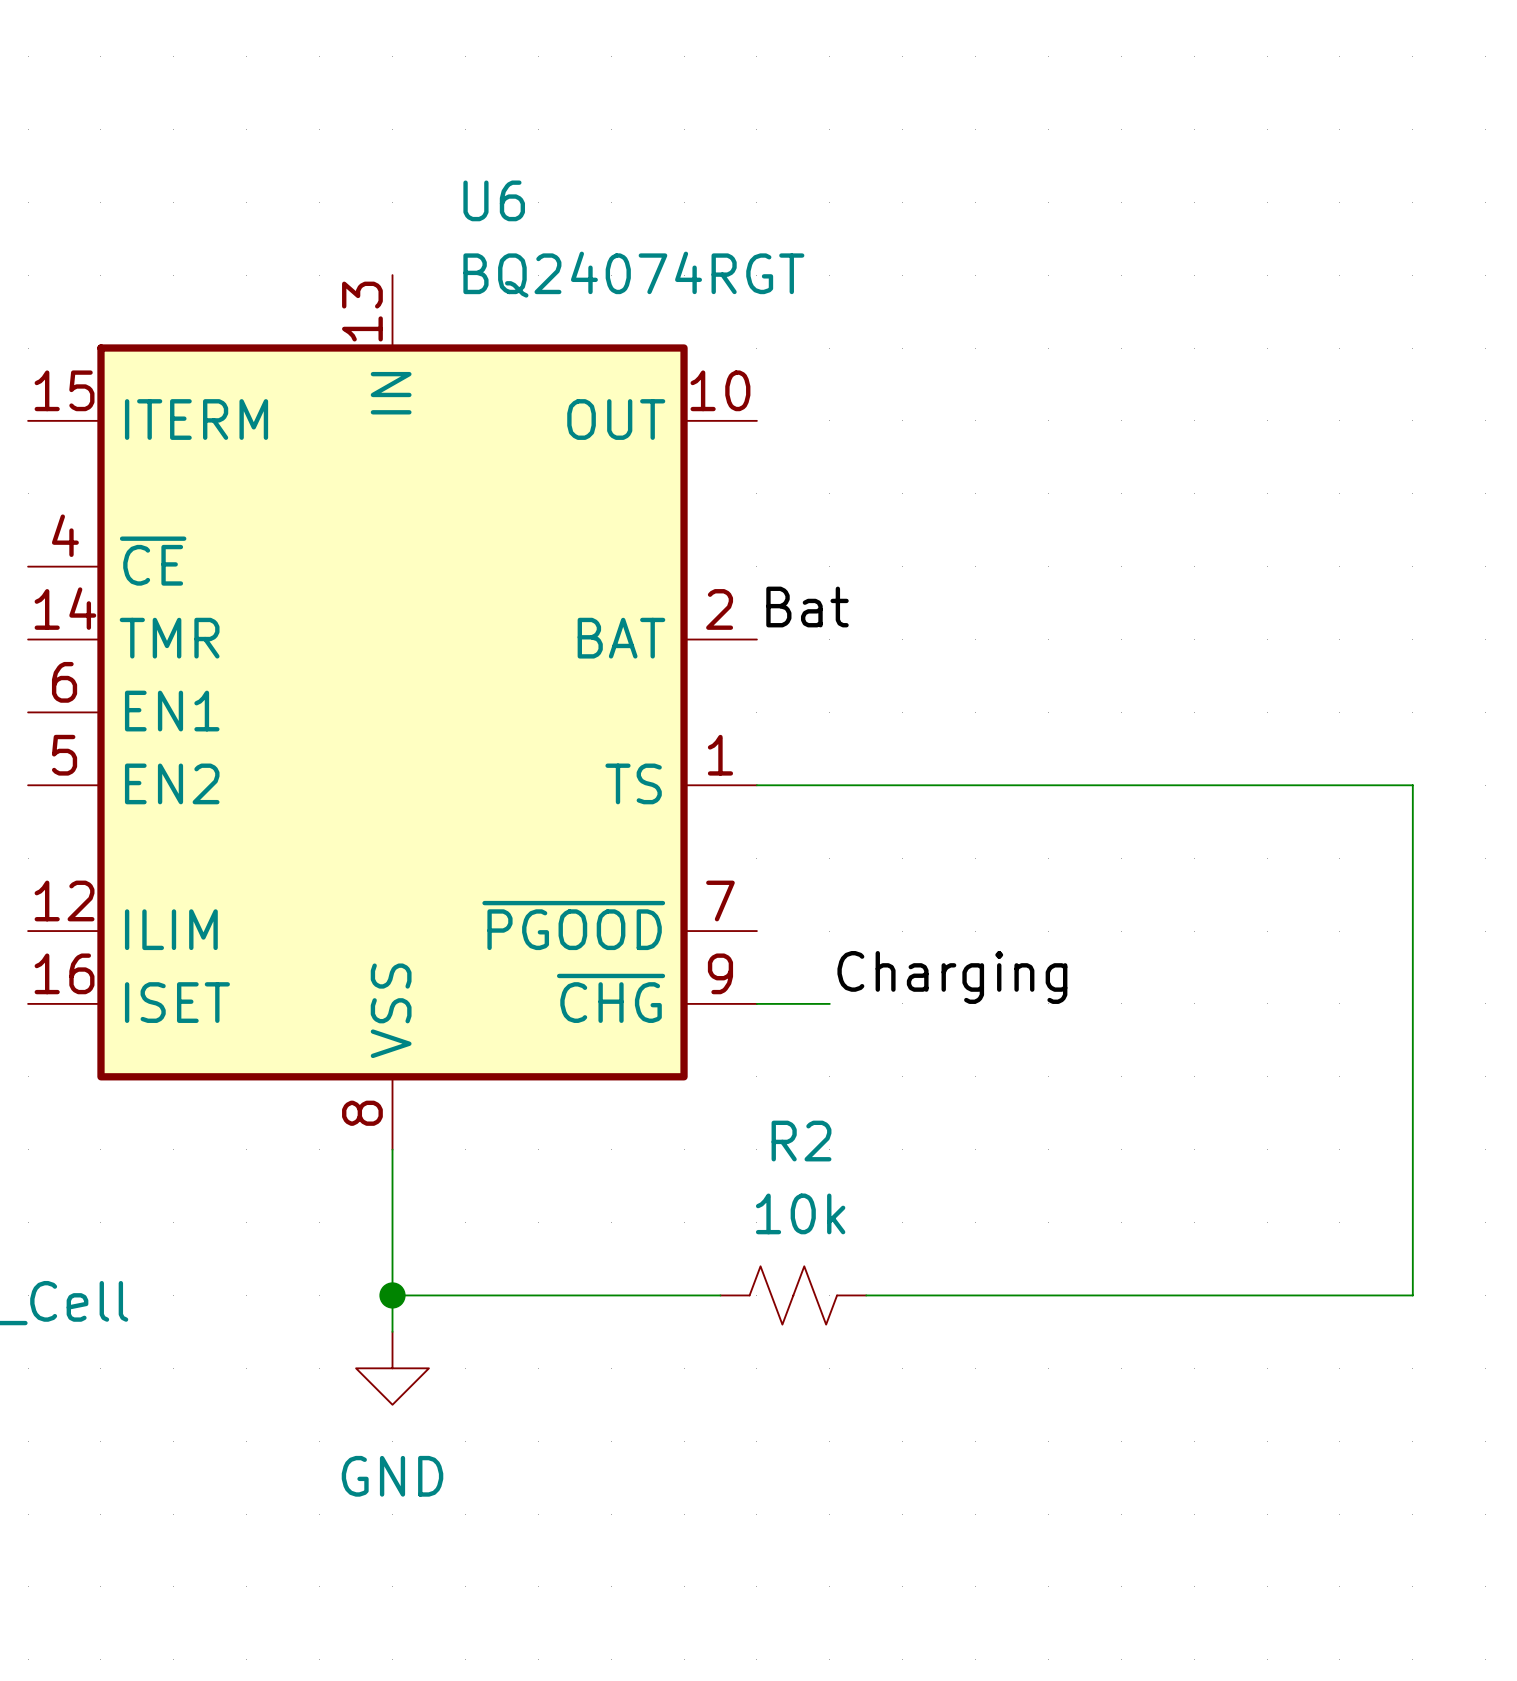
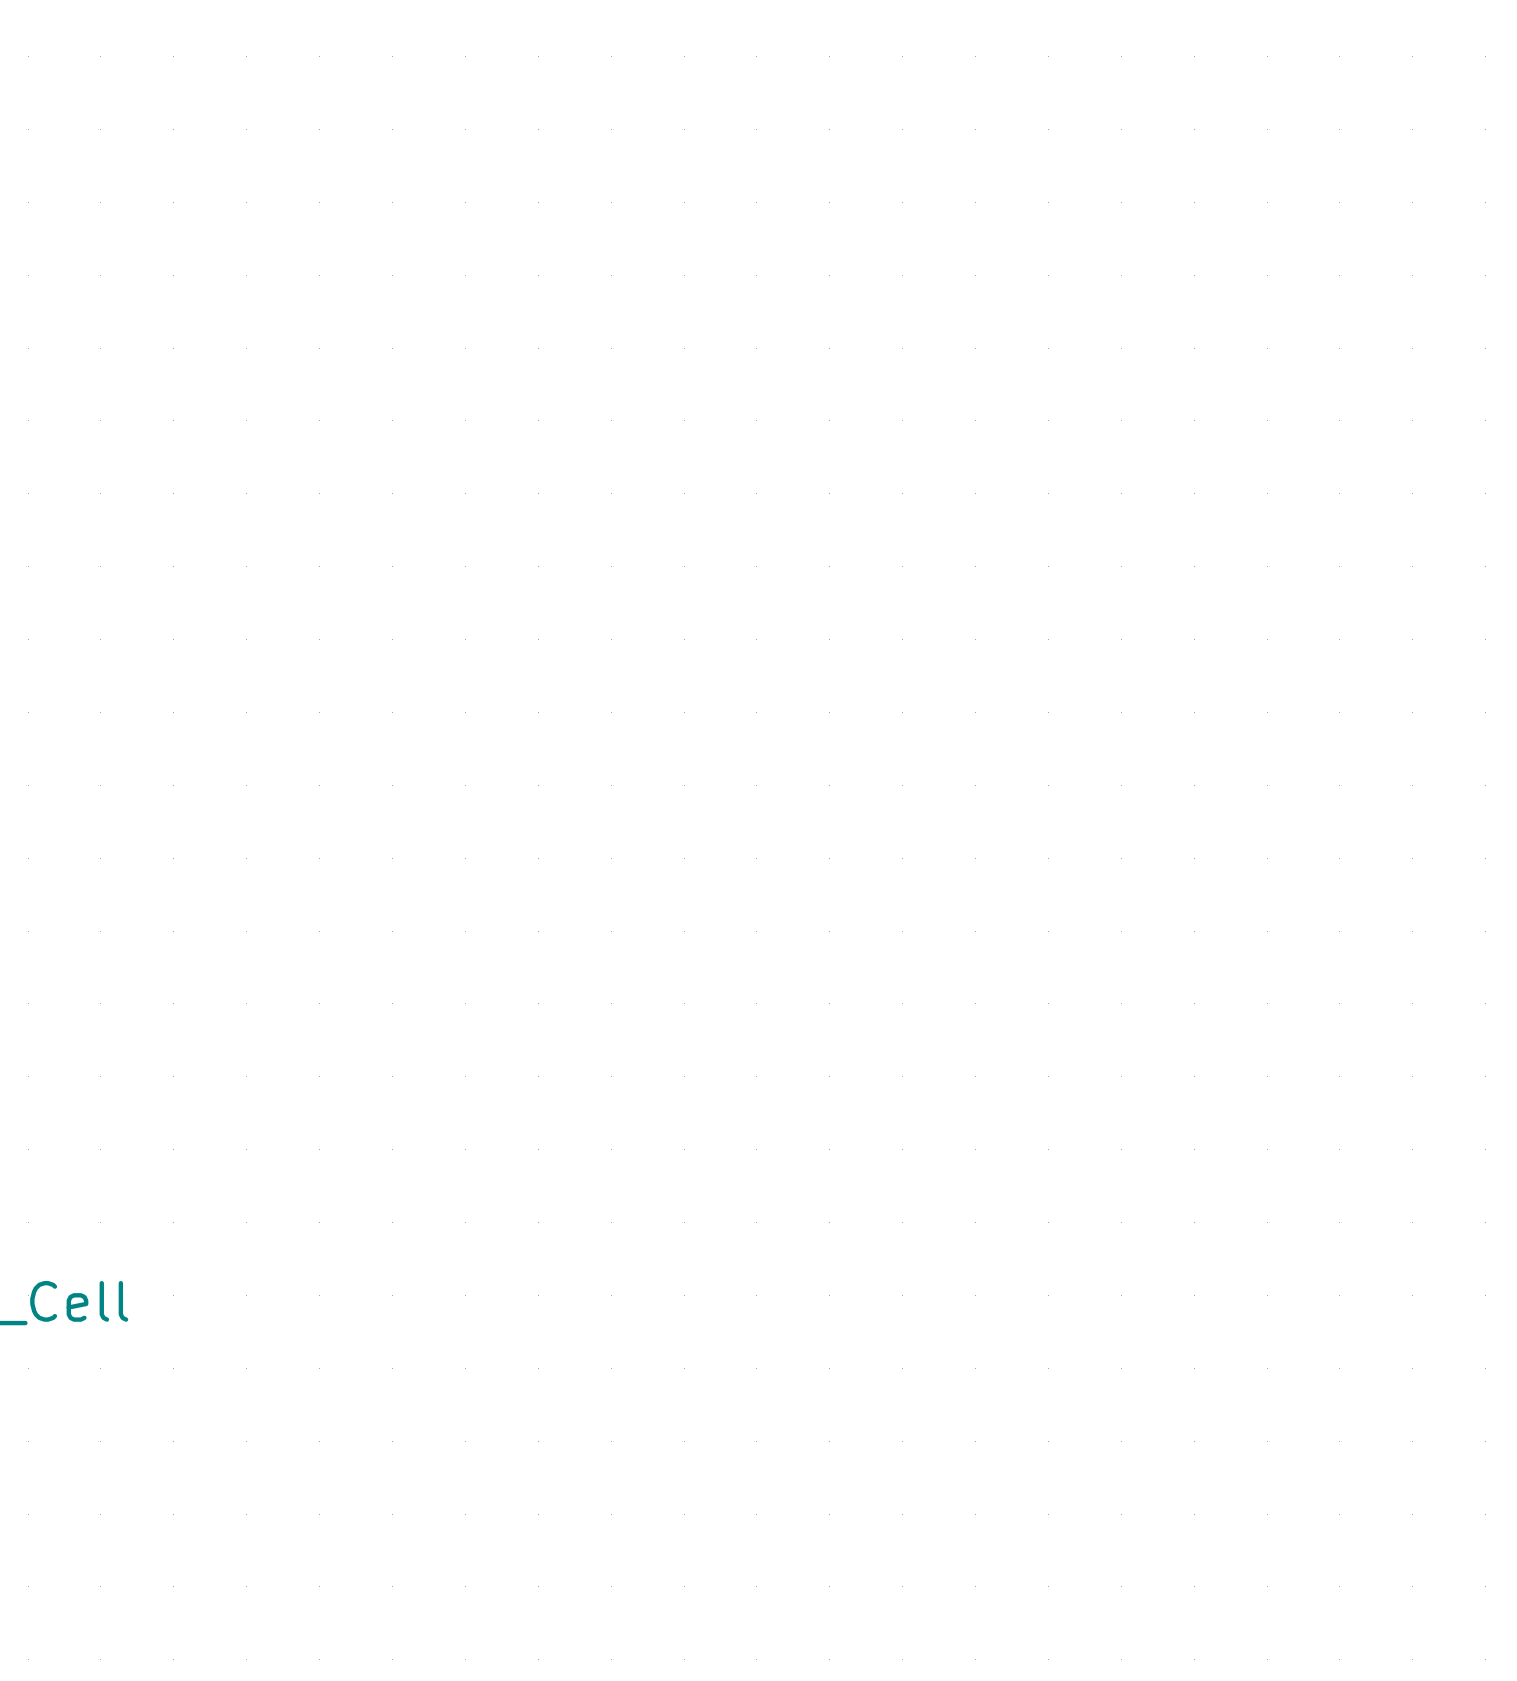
label: Bat (807, 607) -> none
U6: BQ24074RGT (392, 712) -> none
wire: (756, 785) (1412, 785) (1412, 1295) (866, 1295) -> none
label: Charging (952, 977) -> none
wire: (756, 1003) (829, 1003) -> none
wire: (392, 1149) (392, 1331) -> none
wire: (392, 1295) (720, 1295) -> none
junction: (392, 1295) -> none
R2: 10k (793, 1295) -> none
power symbol: GND (392, 1368) -> none

